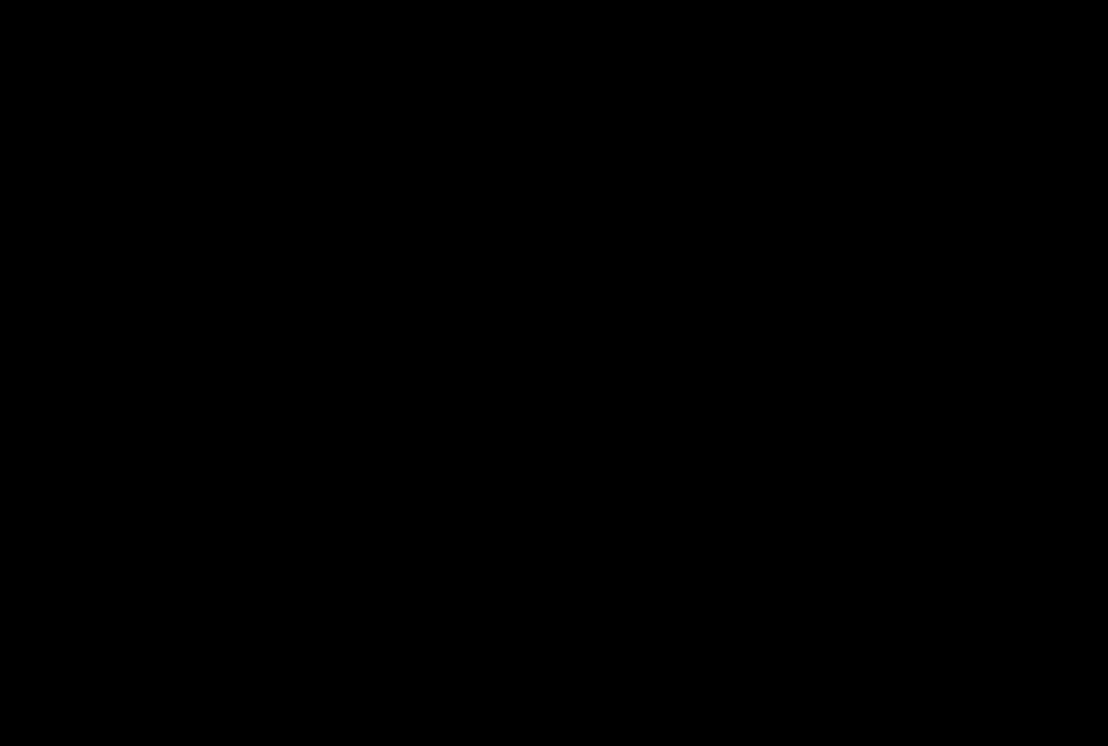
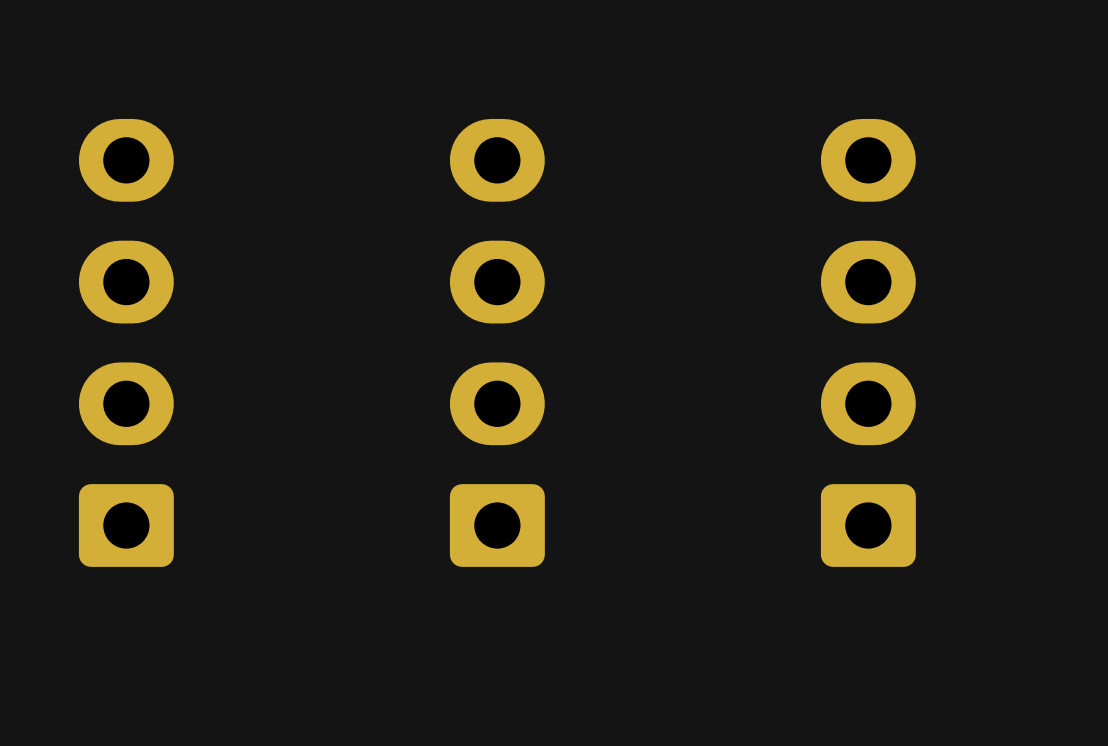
part: none -> (126, 342)
part: none -> (497, 342)
part: none -> (868, 342)

